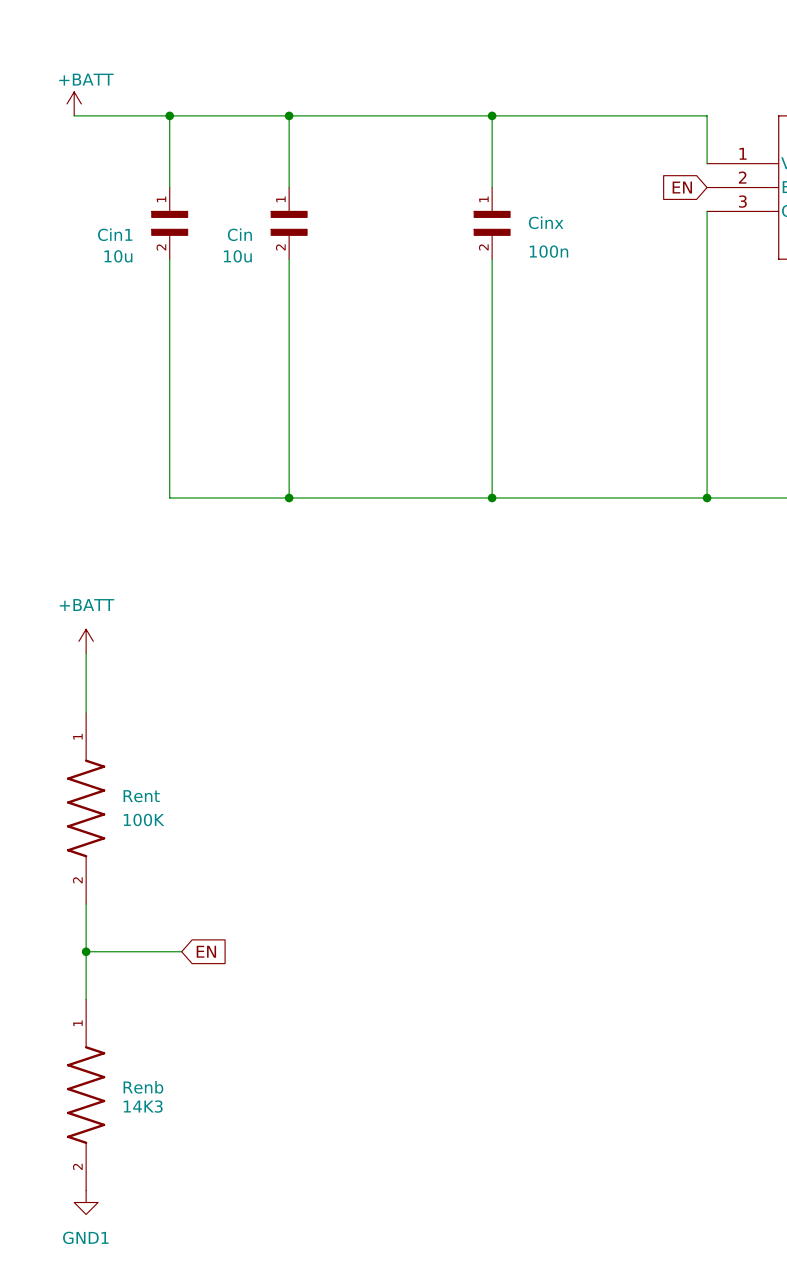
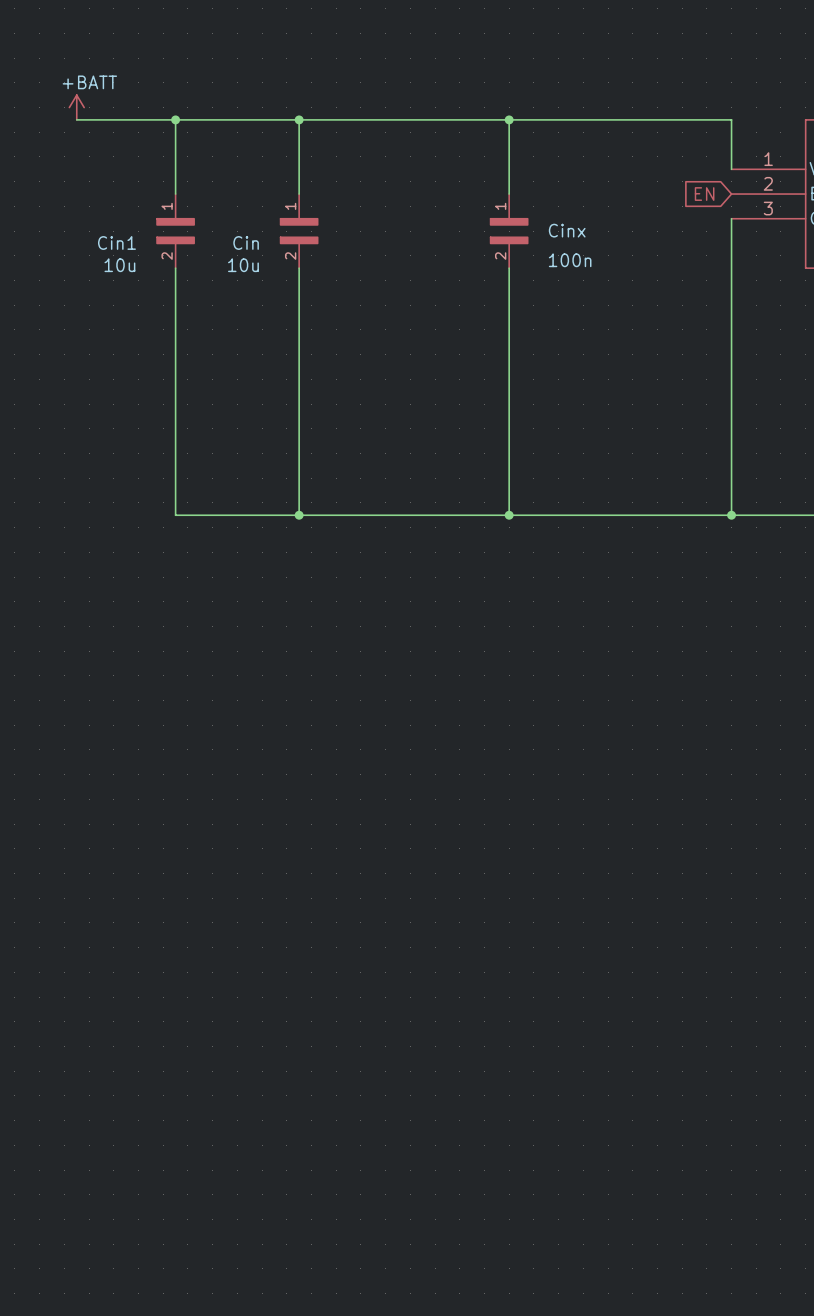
power symbol: +BATT (86, 641) -> none
wire: (86, 653) (86, 712) -> none
Rent: 100K (86, 808) -> none
wire: (86, 903) (86, 999) -> none
wire: (86, 951) (181, 951) -> none
junction: (86, 951) -> none
global label: EN (206, 951) -> none
Renb: 14K3 (86, 1095) -> none
power symbol: GND1 (86, 1202) -> none

